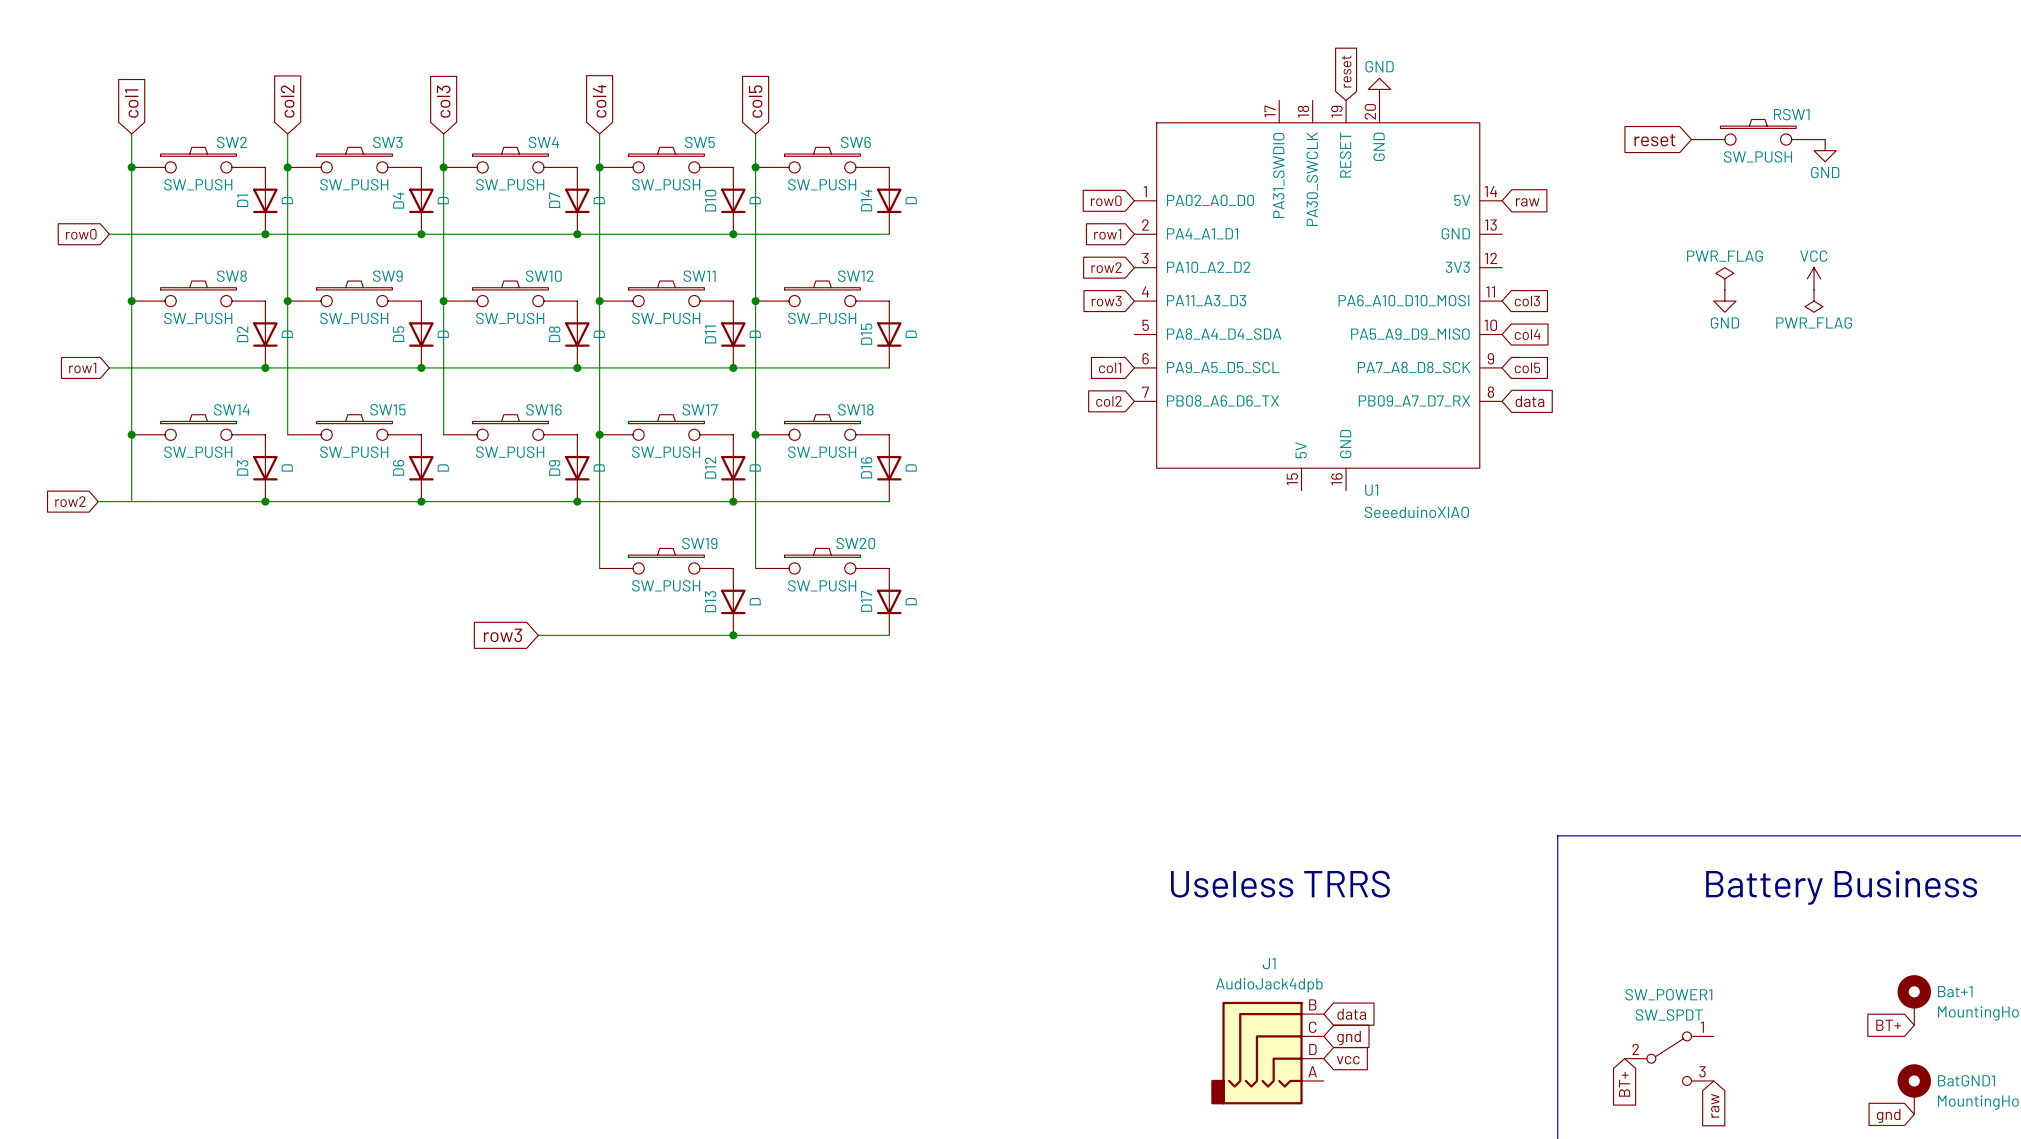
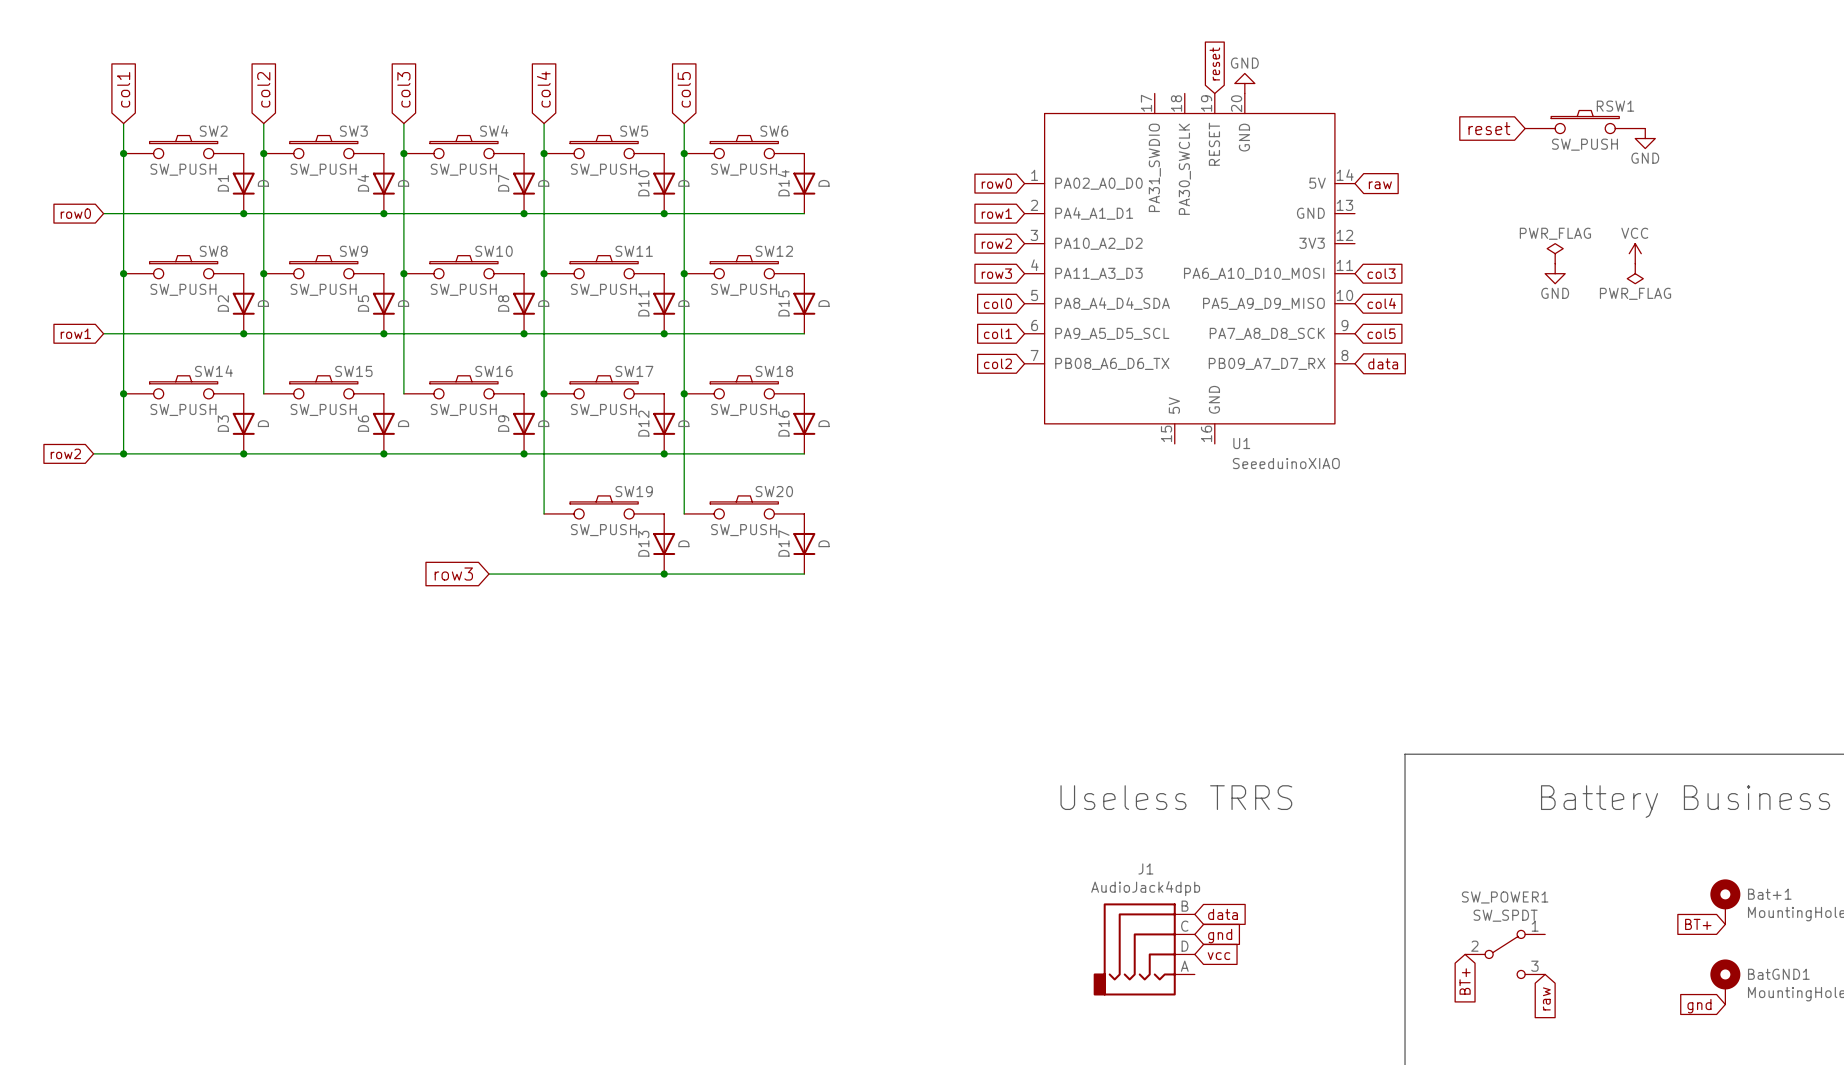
global label: none -> col0 (997, 303)
junction: none -> (123, 453)

